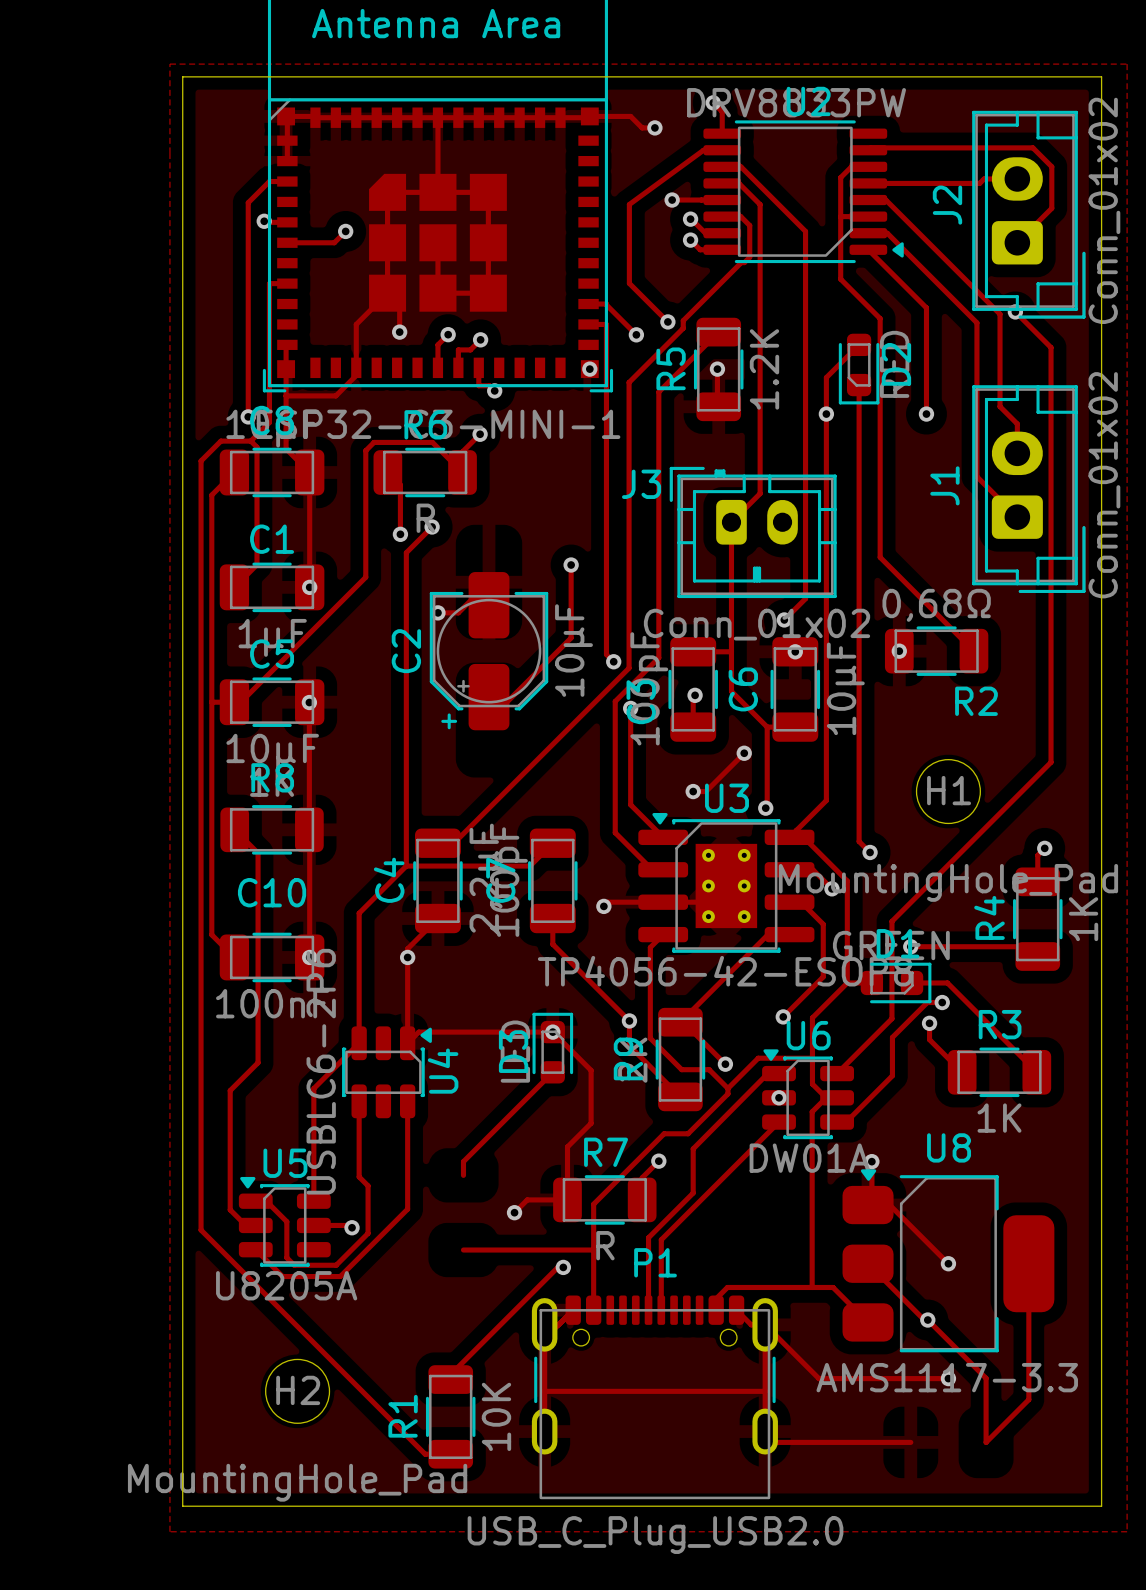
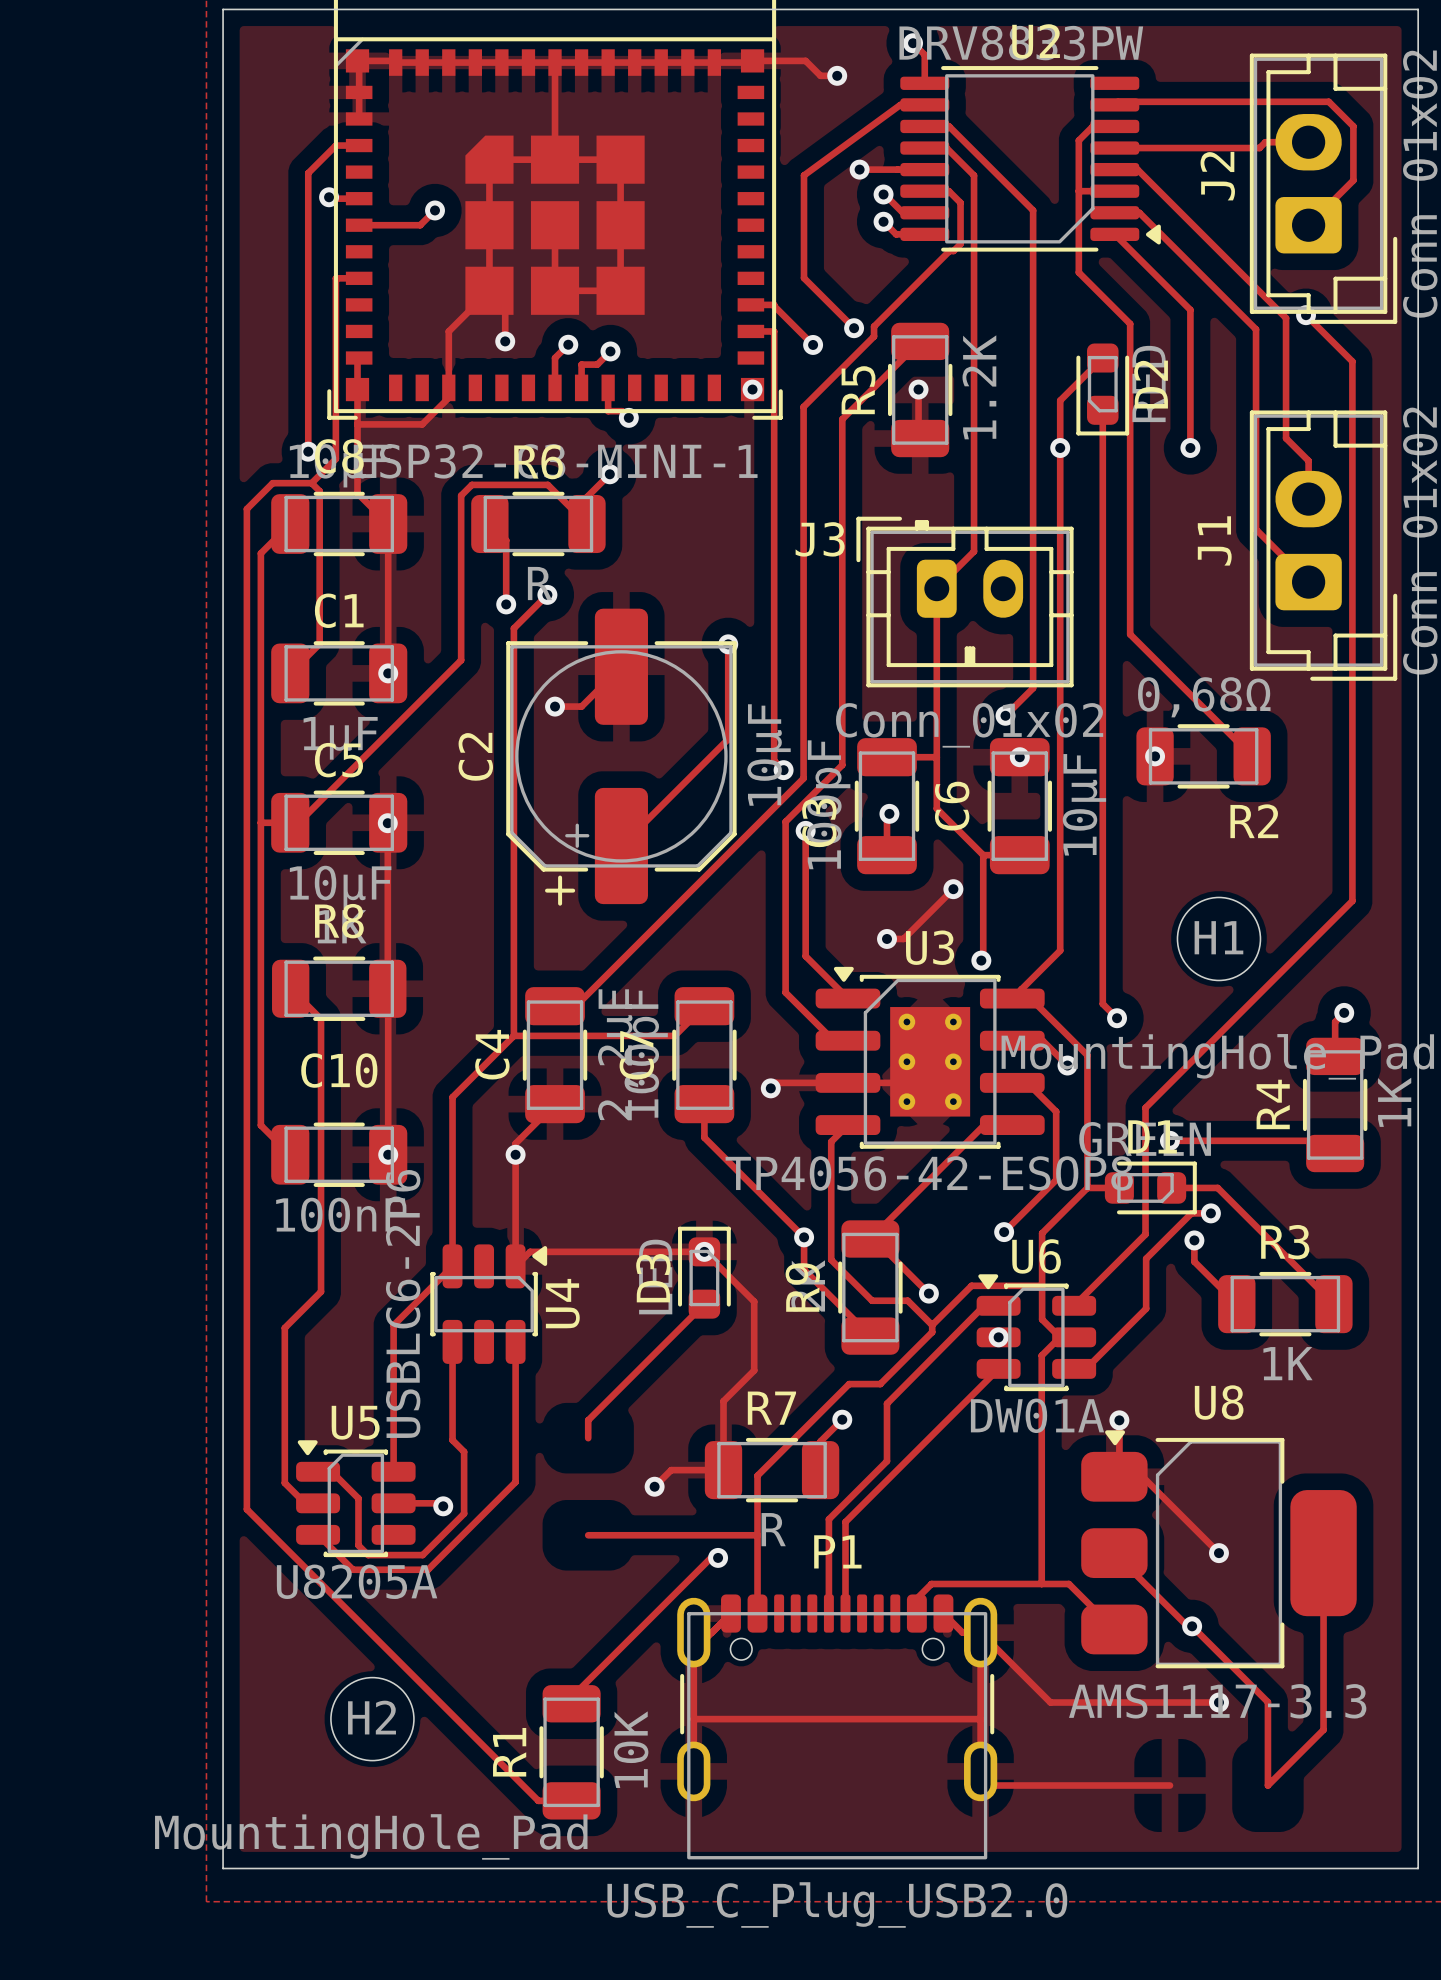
C2 footprint: [429, 572, 549, 731] -> [506, 608, 737, 906]

